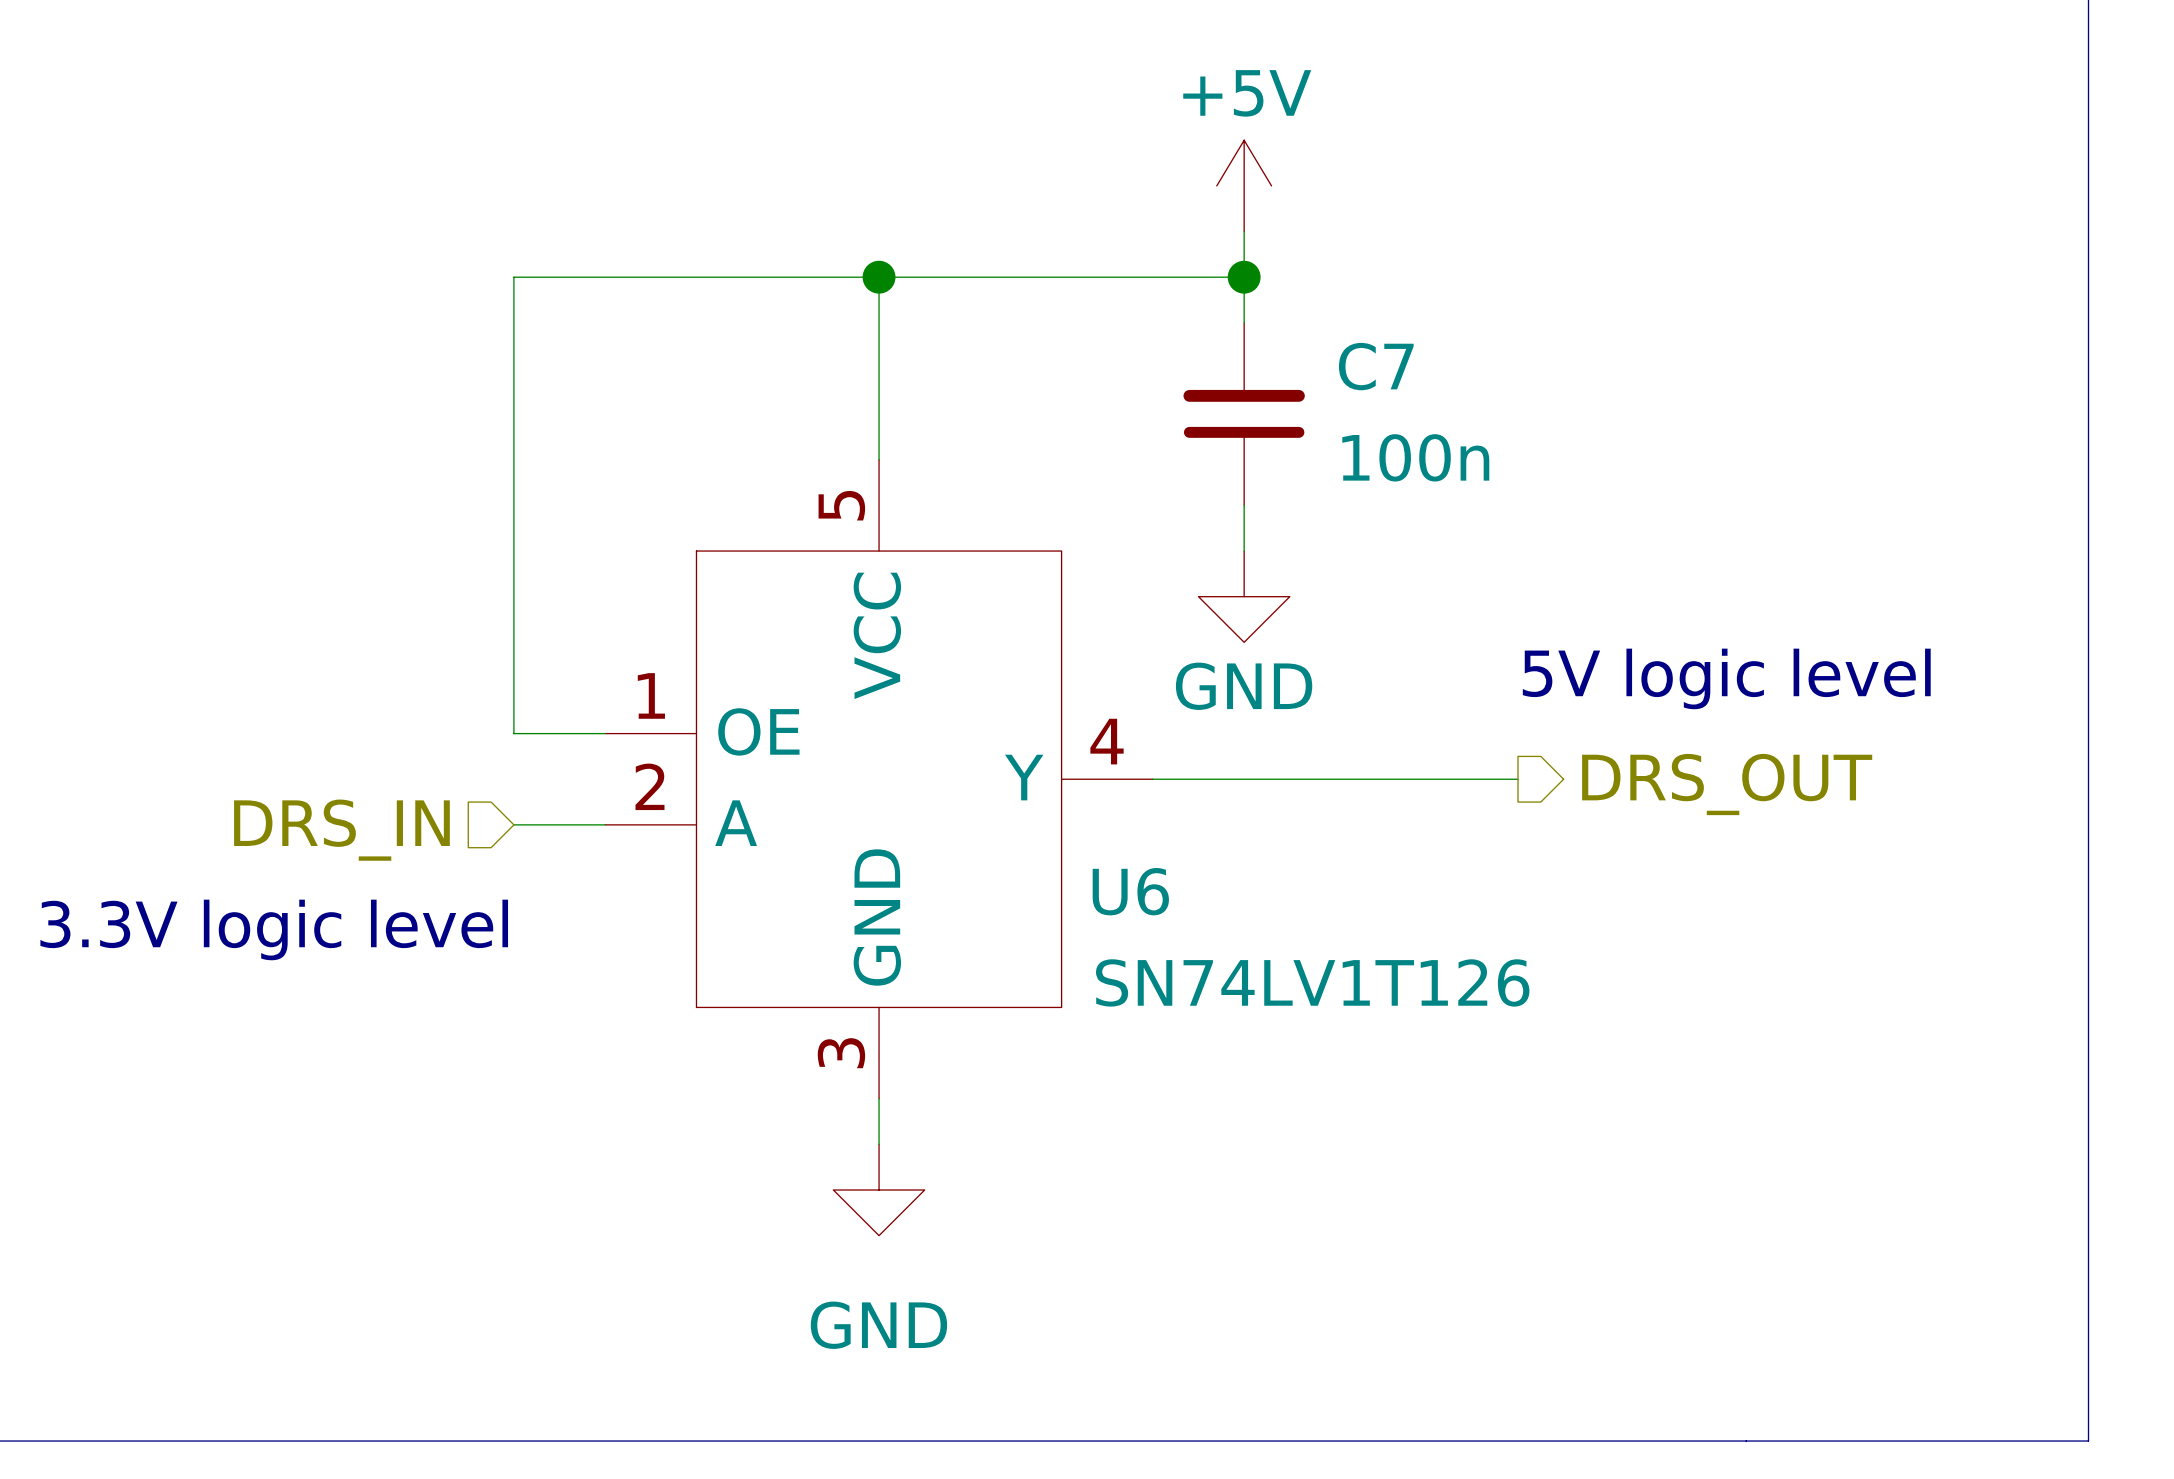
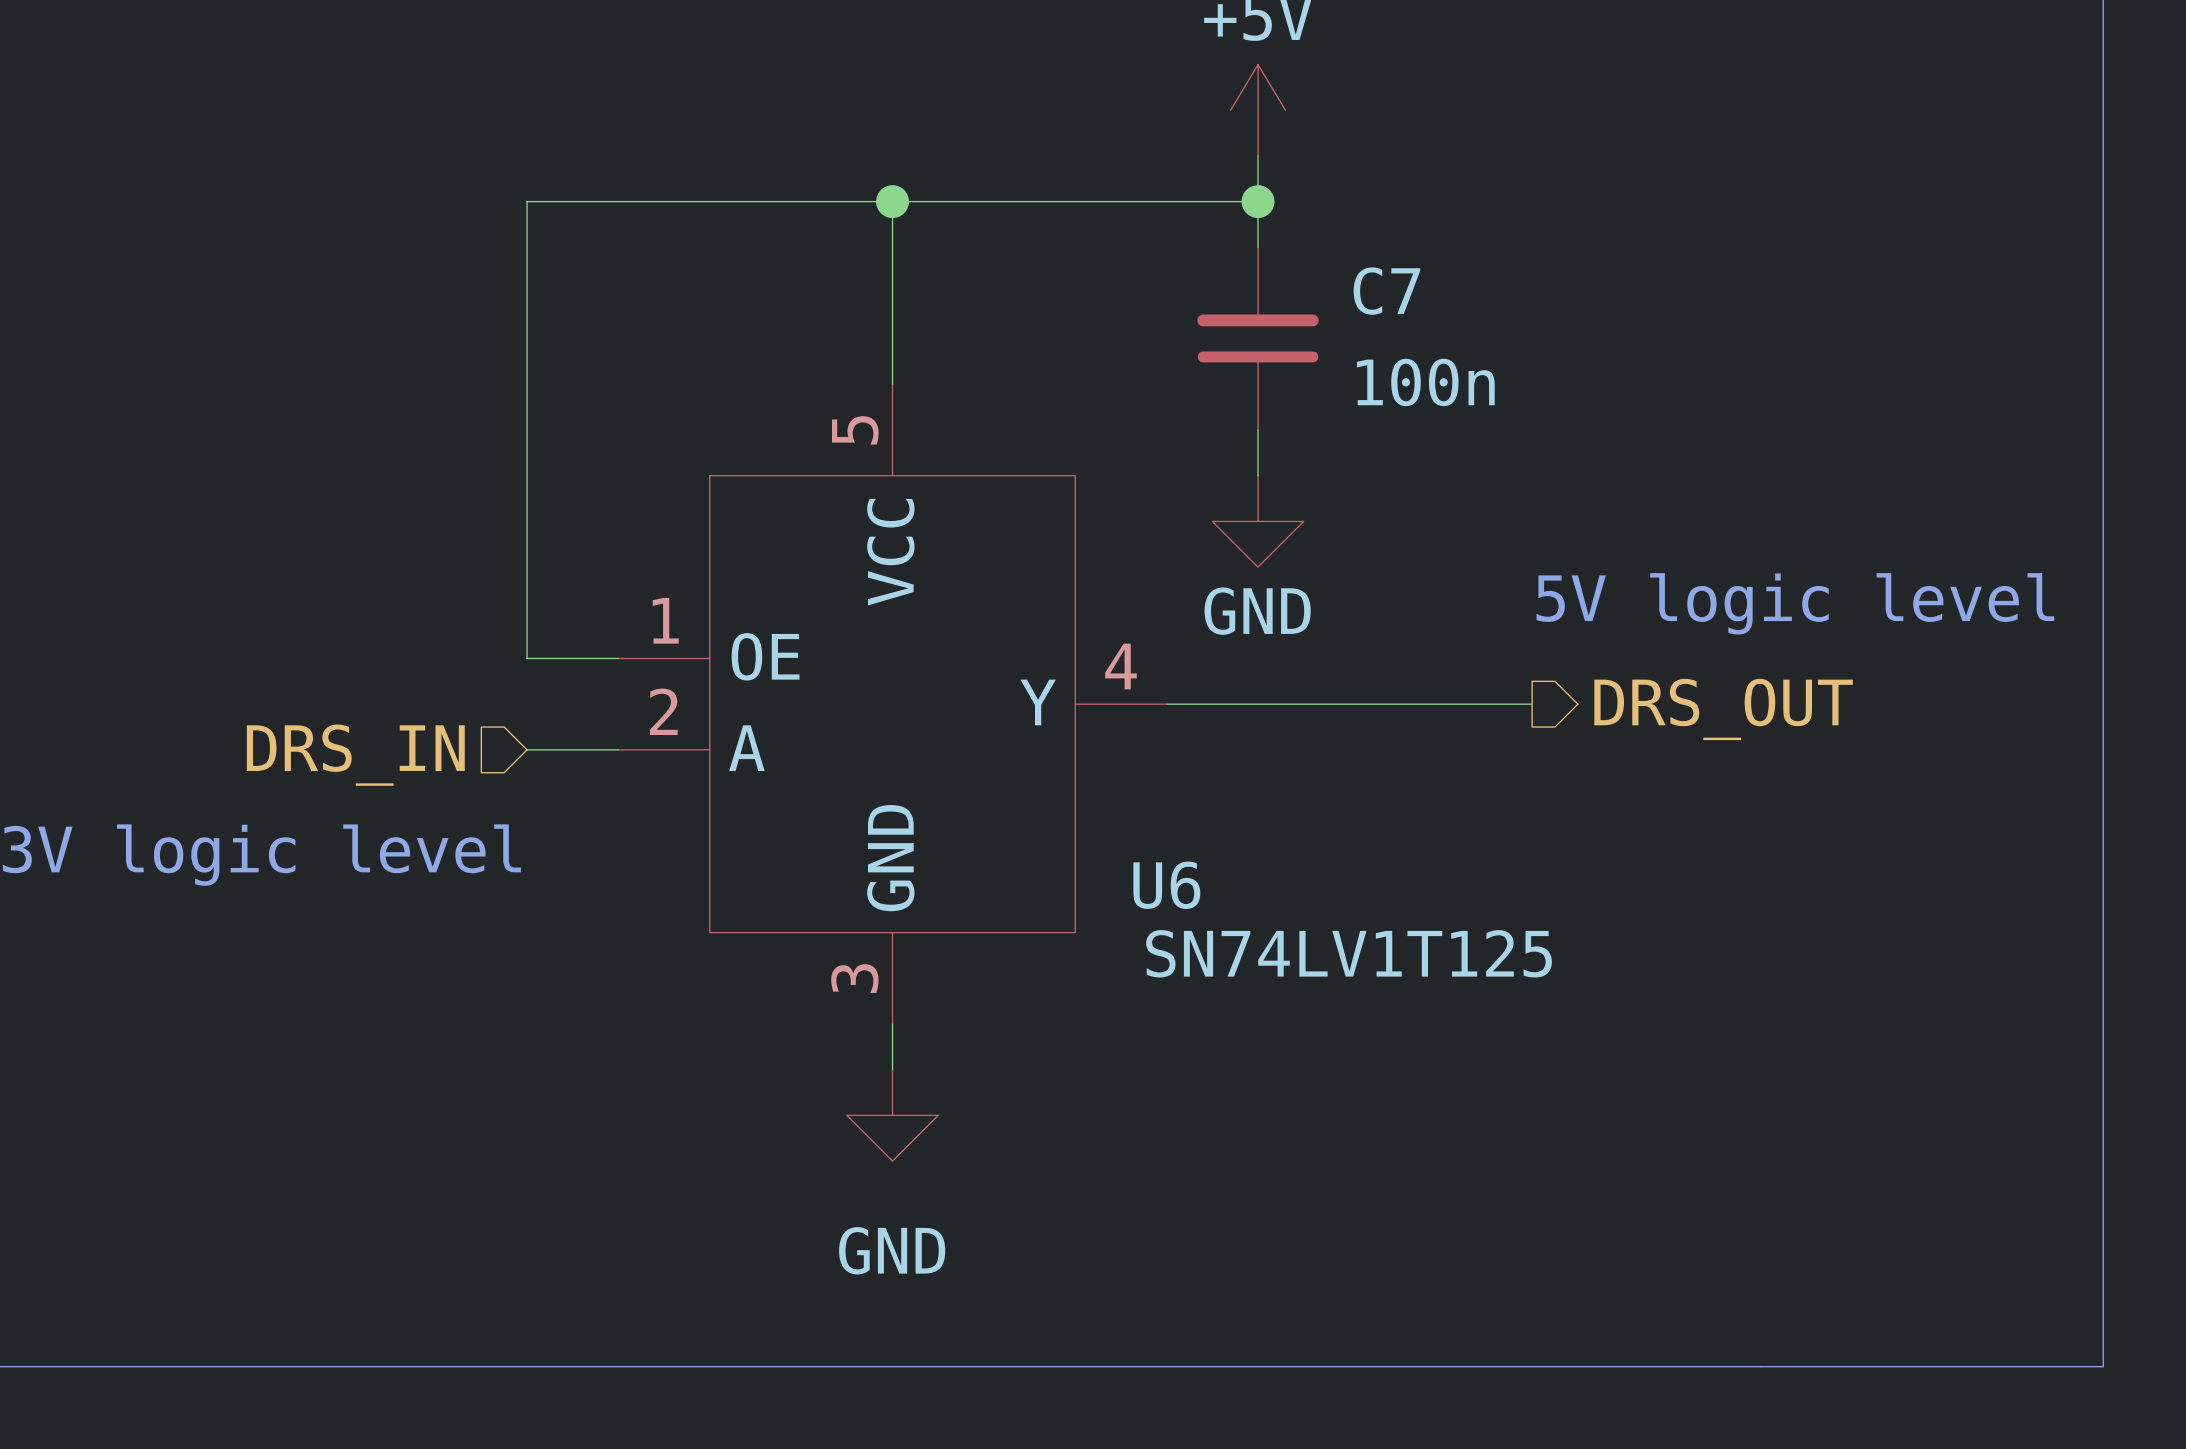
U6 name position: U6 (1130, 891) -> U6 (1166, 885)
U6 value: SN74LV1T126 (1312, 982) -> SN74LV1T125 (1349, 953)

